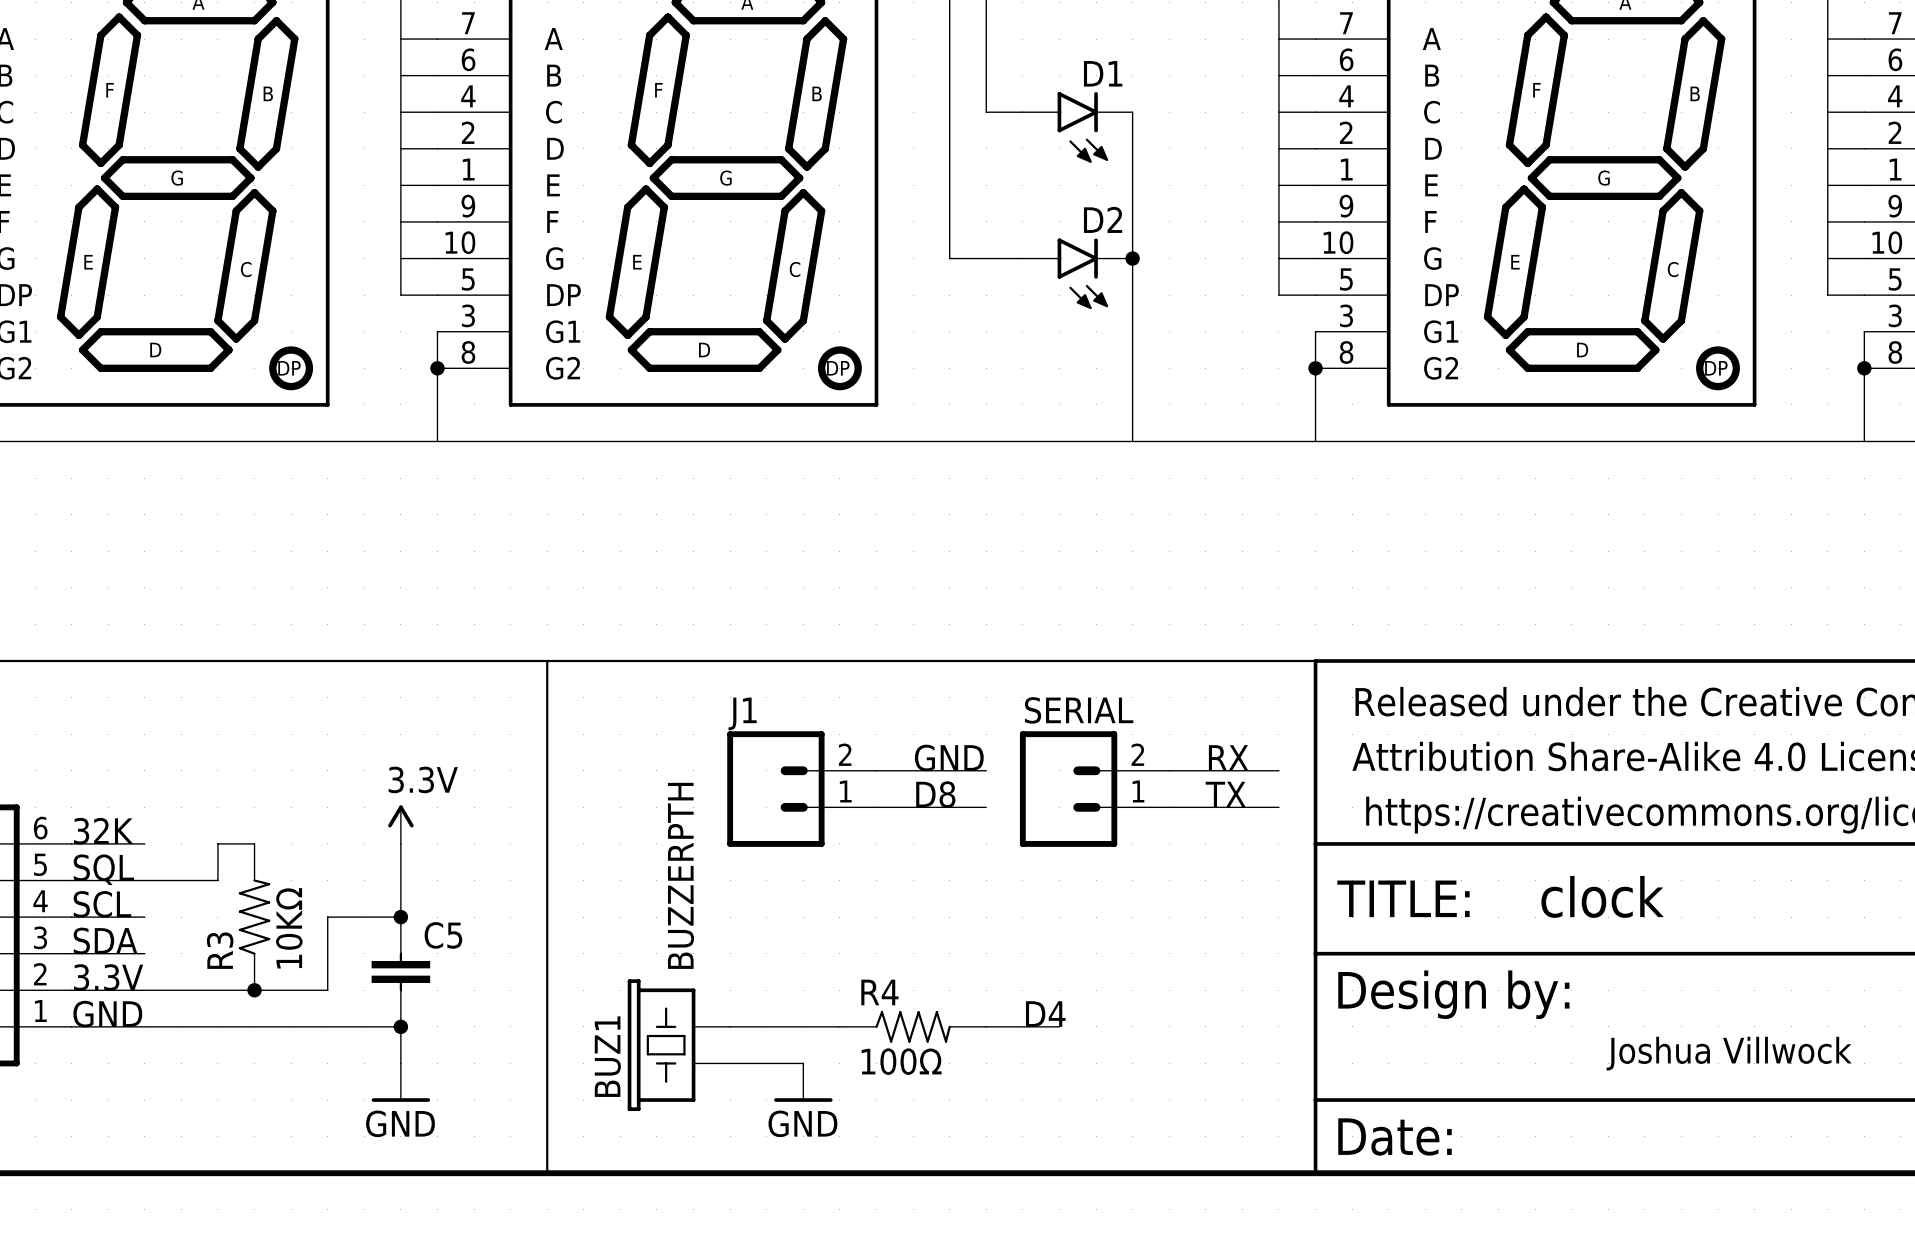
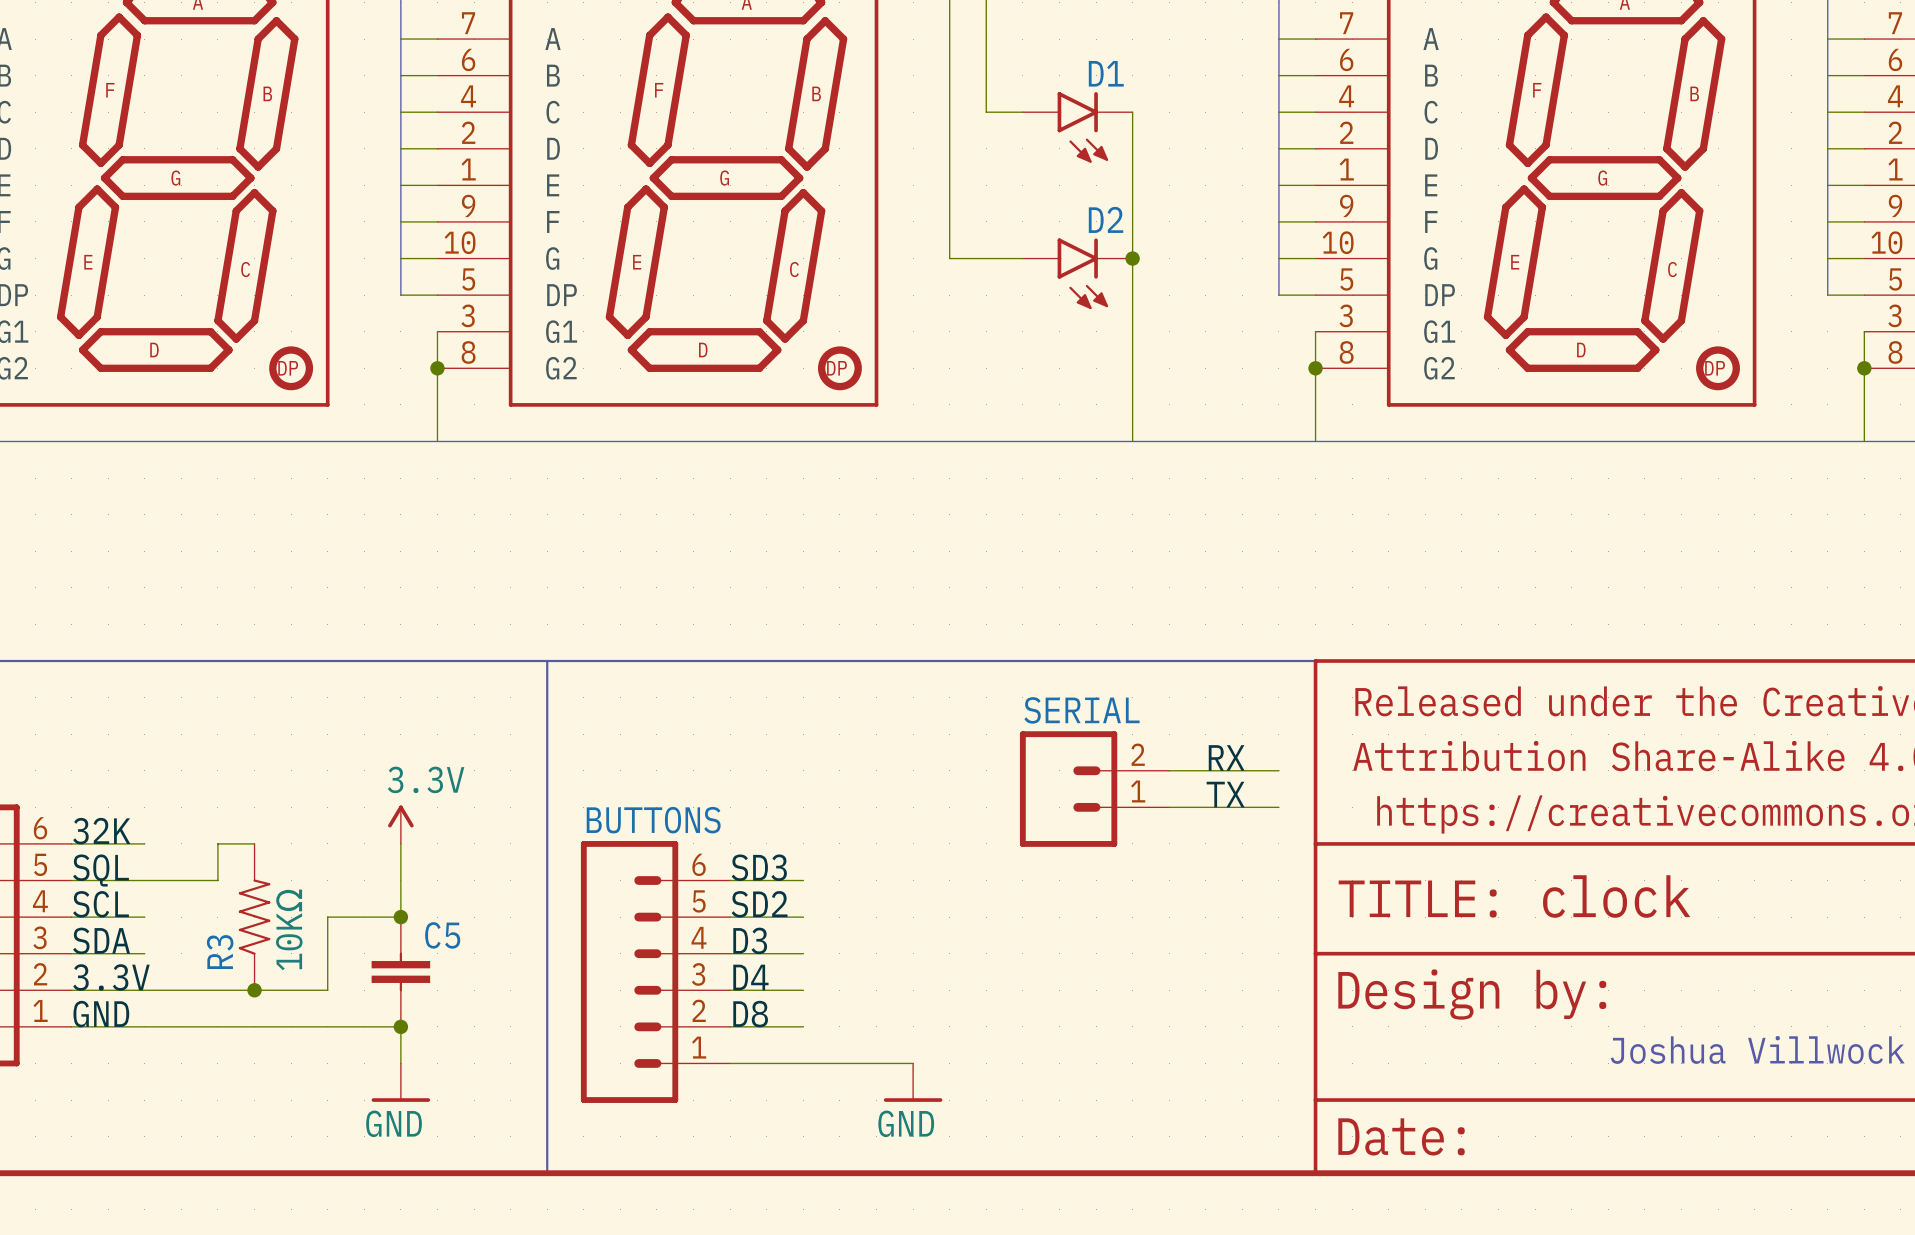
label: GND (949, 757) -> none
wire: (876, 770) (986, 770) -> none
J1: (801, 789) -> none
label position: D8 (935, 794) -> D8 (750, 1014)
wire: (876, 807) (986, 807) -> (803, 1063) (913, 1063)
label: none -> SD3 (759, 867)
wire: none -> (730, 880) (803, 880)
label: none -> SD2 (759, 904)
wire: none -> (730, 917) (803, 917)
label: none -> D3 (750, 940)
wire: none -> (730, 953) (803, 953)
BUTTONS: none -> (655, 971)
label position: D4 (1045, 1014) -> D4 (750, 977)
wire: (803, 1026) (839, 1026) -> none
R4: 100Ω (913, 1026) -> none
wire: (986, 1026) (1059, 1026) -> (730, 990) (803, 990)
BUZ1: BUZZERPTH (678, 1045) -> none
power symbol position: GND (803, 1082) -> GND (913, 1082)

